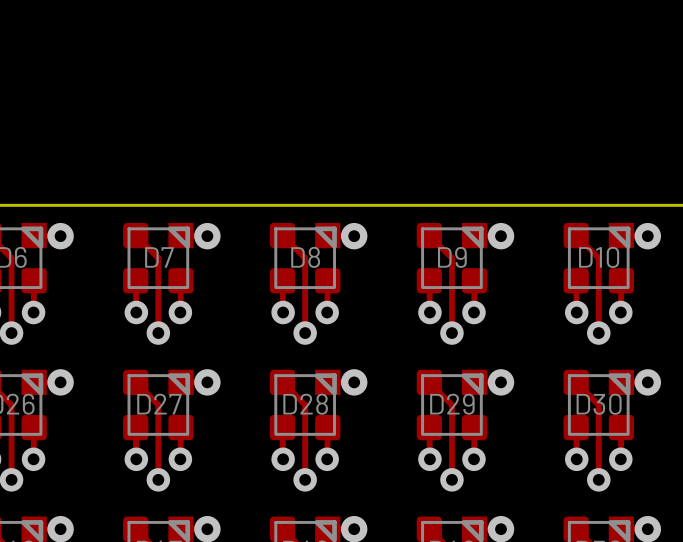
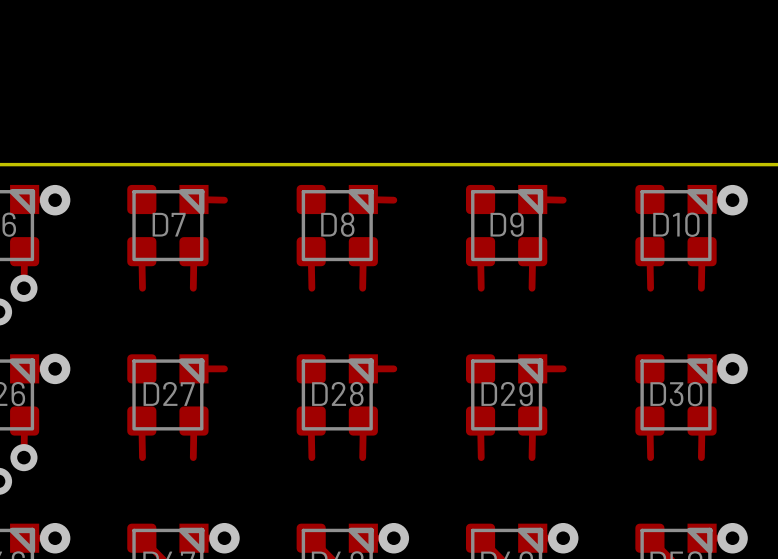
track: (135, 235) (158, 258) (158, 333) -> none
track: (282, 235) (305, 258) (305, 333) -> none
track: (429, 235) (451, 258) (451, 333) -> none
track: (576, 235) (598, 258) (598, 333) -> none
via: (207, 236) -> none
via: (354, 236) -> none
via: (500, 236) -> none
via: (136, 312) -> none
via: (180, 312) -> none
via: (283, 312) -> none
via: (327, 312) -> none
via: (429, 312) -> none
via: (473, 312) -> none
via: (576, 312) -> none
via: (620, 312) -> none
via: (158, 333) -> none
via: (305, 333) -> none
via: (451, 333) -> none
via: (598, 333) -> none
track: (135, 382) (158, 404) (158, 479) -> none
via: (207, 382) -> none
track: (282, 382) (305, 404) (305, 479) -> none
via: (354, 382) -> none
track: (429, 382) (451, 404) (451, 479) -> none
via: (500, 382) -> none
track: (576, 382) (598, 404) (598, 479) -> none
via: (136, 459) -> none
via: (180, 459) -> none
via: (283, 459) -> none
via: (327, 459) -> none
via: (429, 459) -> none
via: (473, 459) -> none
via: (576, 459) -> none
via: (620, 459) -> none
via: (158, 479) -> none
via: (305, 479) -> none
via: (451, 479) -> none
via: (598, 479) -> none

